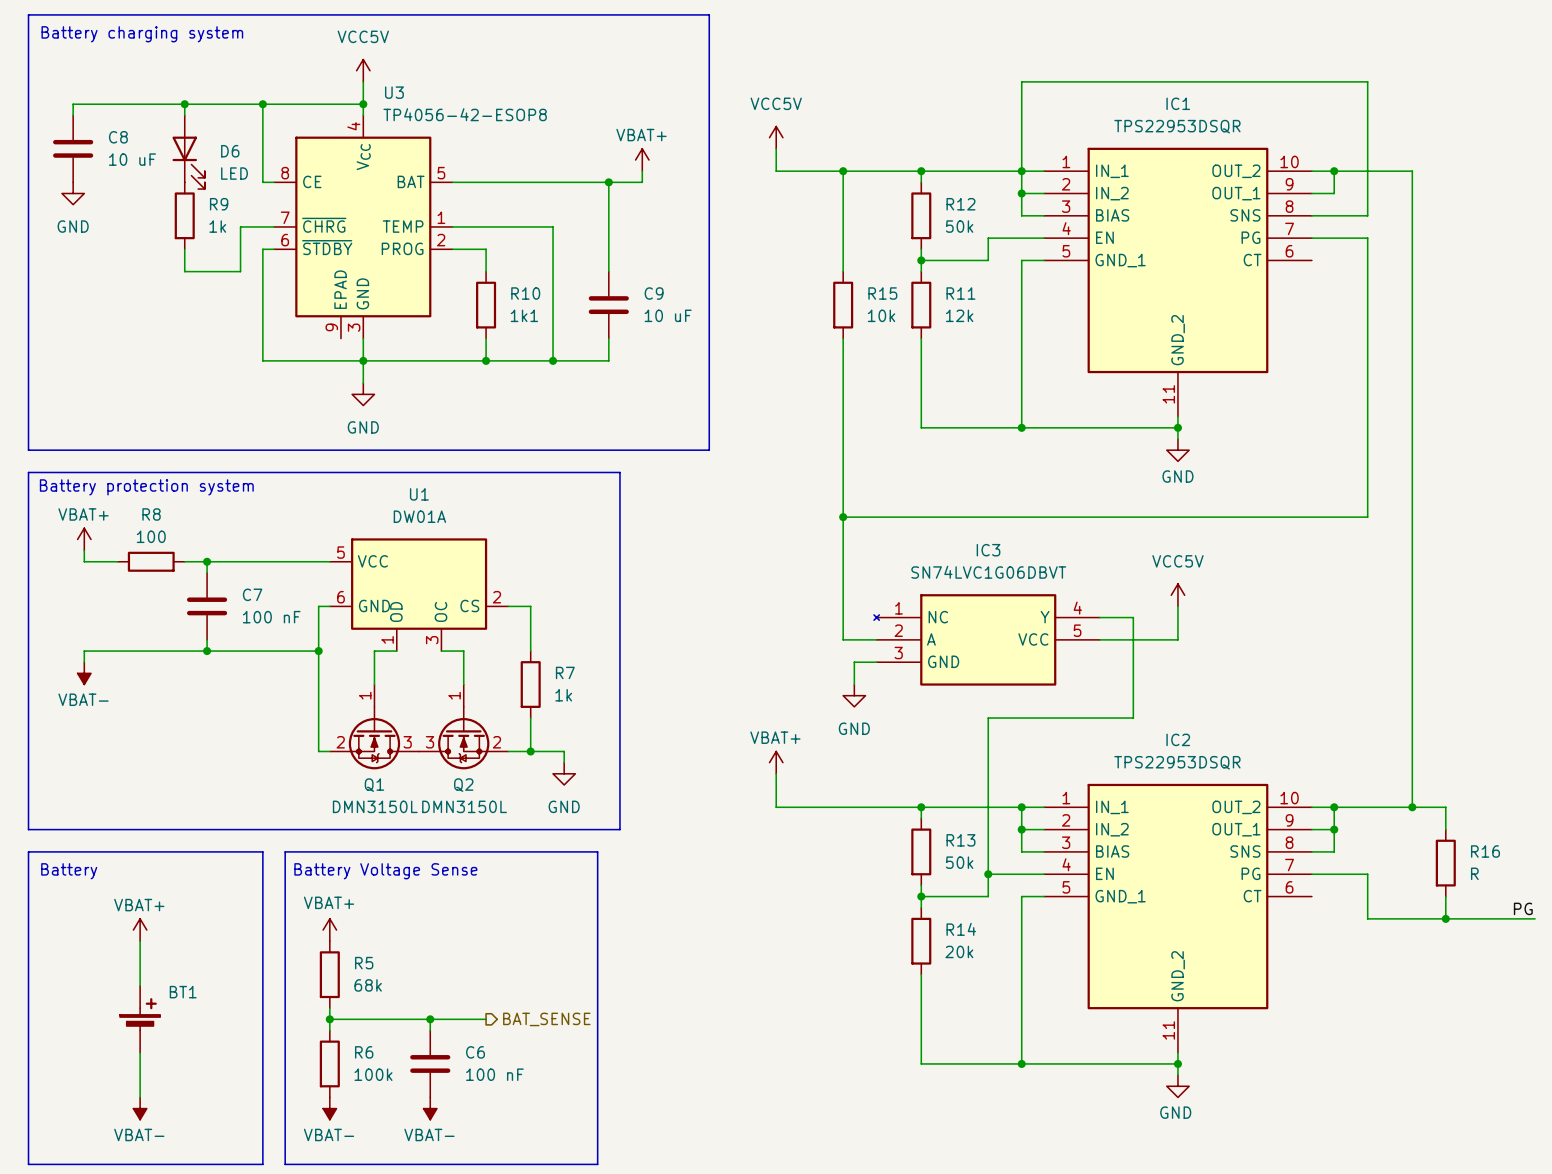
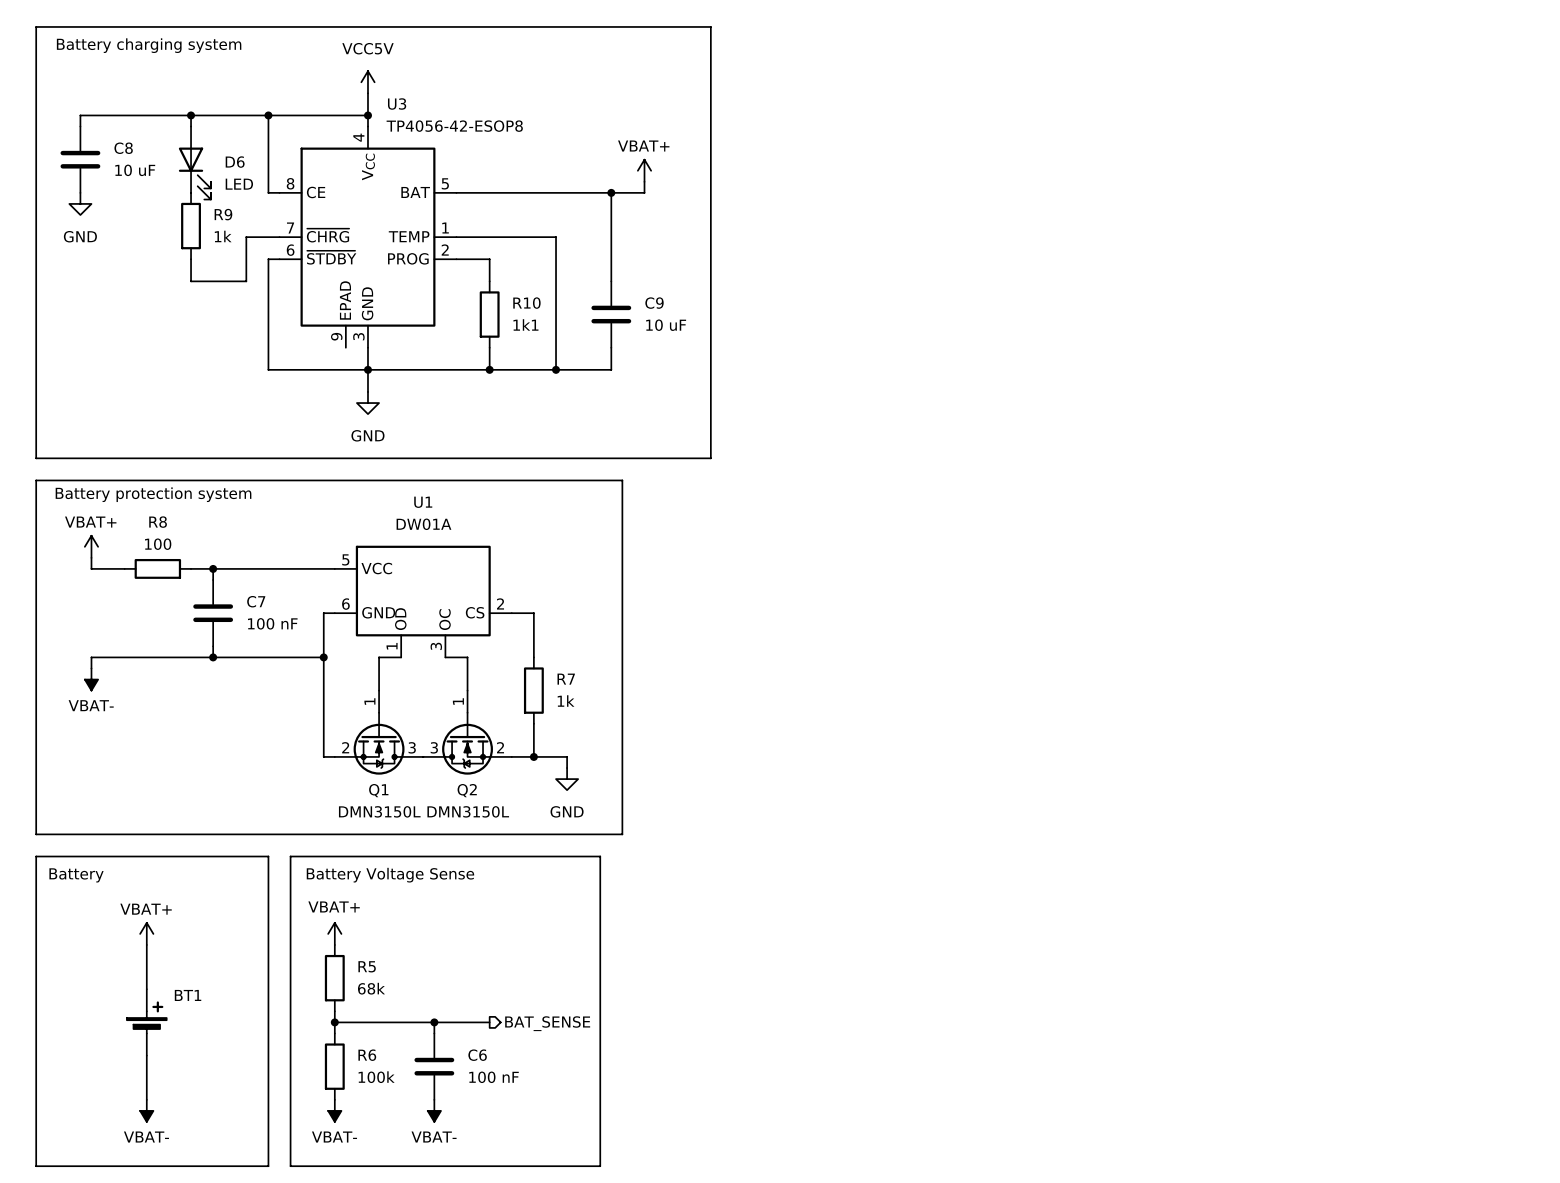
power symbol: VCC5V (776, 137) -> none
wire: (776, 148) (776, 171) (1044, 171) -> none
wire: (843, 171) (843, 271) -> none
junction: (843, 171) -> none
wire: (921, 171) (921, 182) -> none
junction: (921, 171) -> none
junction: (1021, 171) -> none
wire: (1311, 171) (1412, 171) (1412, 807) -> none
wire: (1334, 171) (1334, 193) (1311, 193) -> none
junction: (1334, 171) -> none
wire: (1021, 193) (1044, 193) -> none
junction: (1021, 193) -> none
R12: 50k (921, 215) -> none
wire: (1044, 215) (1021, 215) (1021, 81) (1367, 81) (1367, 215) (1311, 215) -> none
wire: (1044, 238) (988, 238) (988, 260) (921, 260) -> none
wire: (1311, 238) (1367, 238) (1367, 517) (843, 517) -> none
wire: (921, 249) (921, 271) -> none
junction: (921, 260) -> none
wire: (1044, 260) (1021, 260) (1021, 427) -> none
IC1: TPS22953DSQR (1177, 282) -> none
R15: 10k (843, 305) -> none
R11: 12k (921, 305) -> none
wire: (843, 338) (843, 639) (876, 639) -> none
wire: (921, 338) (921, 427) (1177, 427) -> none
wire: (1177, 416) (1177, 439) -> none
junction: (1021, 427) -> none
junction: (1177, 427) -> none
power symbol: GND (1177, 450) -> none
junction: (843, 517) -> none
power symbol: VCC5V (1177, 595) -> none
wire: (1177, 606) (1177, 639) (1099, 639) -> none
wire: (1099, 617) (1133, 617) (1133, 718) (988, 718) (988, 896) (921, 896) -> none
IC3: SN74LVC1G06DBVT (986, 639) -> none
wire: (876, 662) (854, 662) (854, 684) -> none
power symbol: GND (854, 695) -> none
power symbol: VBAT+ (776, 762) -> none
wire: (776, 773) (776, 807) (1044, 807) -> none
wire: (921, 807) (921, 818) -> none
junction: (921, 807) -> none
wire: (1021, 807) (1021, 851) (1044, 851) -> none
junction: (1021, 807) -> none
wire: (1311, 807) (1445, 807) (1445, 829) -> none
wire: (1334, 807) (1334, 851) (1311, 851) -> none
junction: (1334, 807) -> none
junction: (1412, 807) -> none
wire: (1021, 829) (1044, 829) -> none
junction: (1021, 829) -> none
wire: (1311, 829) (1334, 829) -> none
junction: (1334, 829) -> none
R13: 50k (921, 851) -> none
R16: R (1445, 863) -> none
wire: (988, 874) (1044, 874) -> none
junction: (988, 874) -> none
wire: (1311, 874) (1367, 874) (1367, 918) (1535, 918) -> none
wire: (921, 885) (921, 907) -> none
junction: (921, 896) -> none
wire: (1044, 896) (1021, 896) (1021, 1063) -> none
wire: (1445, 896) (1445, 918) -> none
label: PG (1523, 908) -> none
IC2: TPS22953DSQR (1177, 918) -> none
junction: (1445, 918) -> none
R14: 20k (921, 941) -> none
wire: (921, 974) (921, 1063) (1177, 1063) -> none
wire: (1177, 1052) (1177, 1075) -> none
junction: (1021, 1063) -> none
junction: (1177, 1063) -> none
power symbol: GND (1177, 1086) -> none

